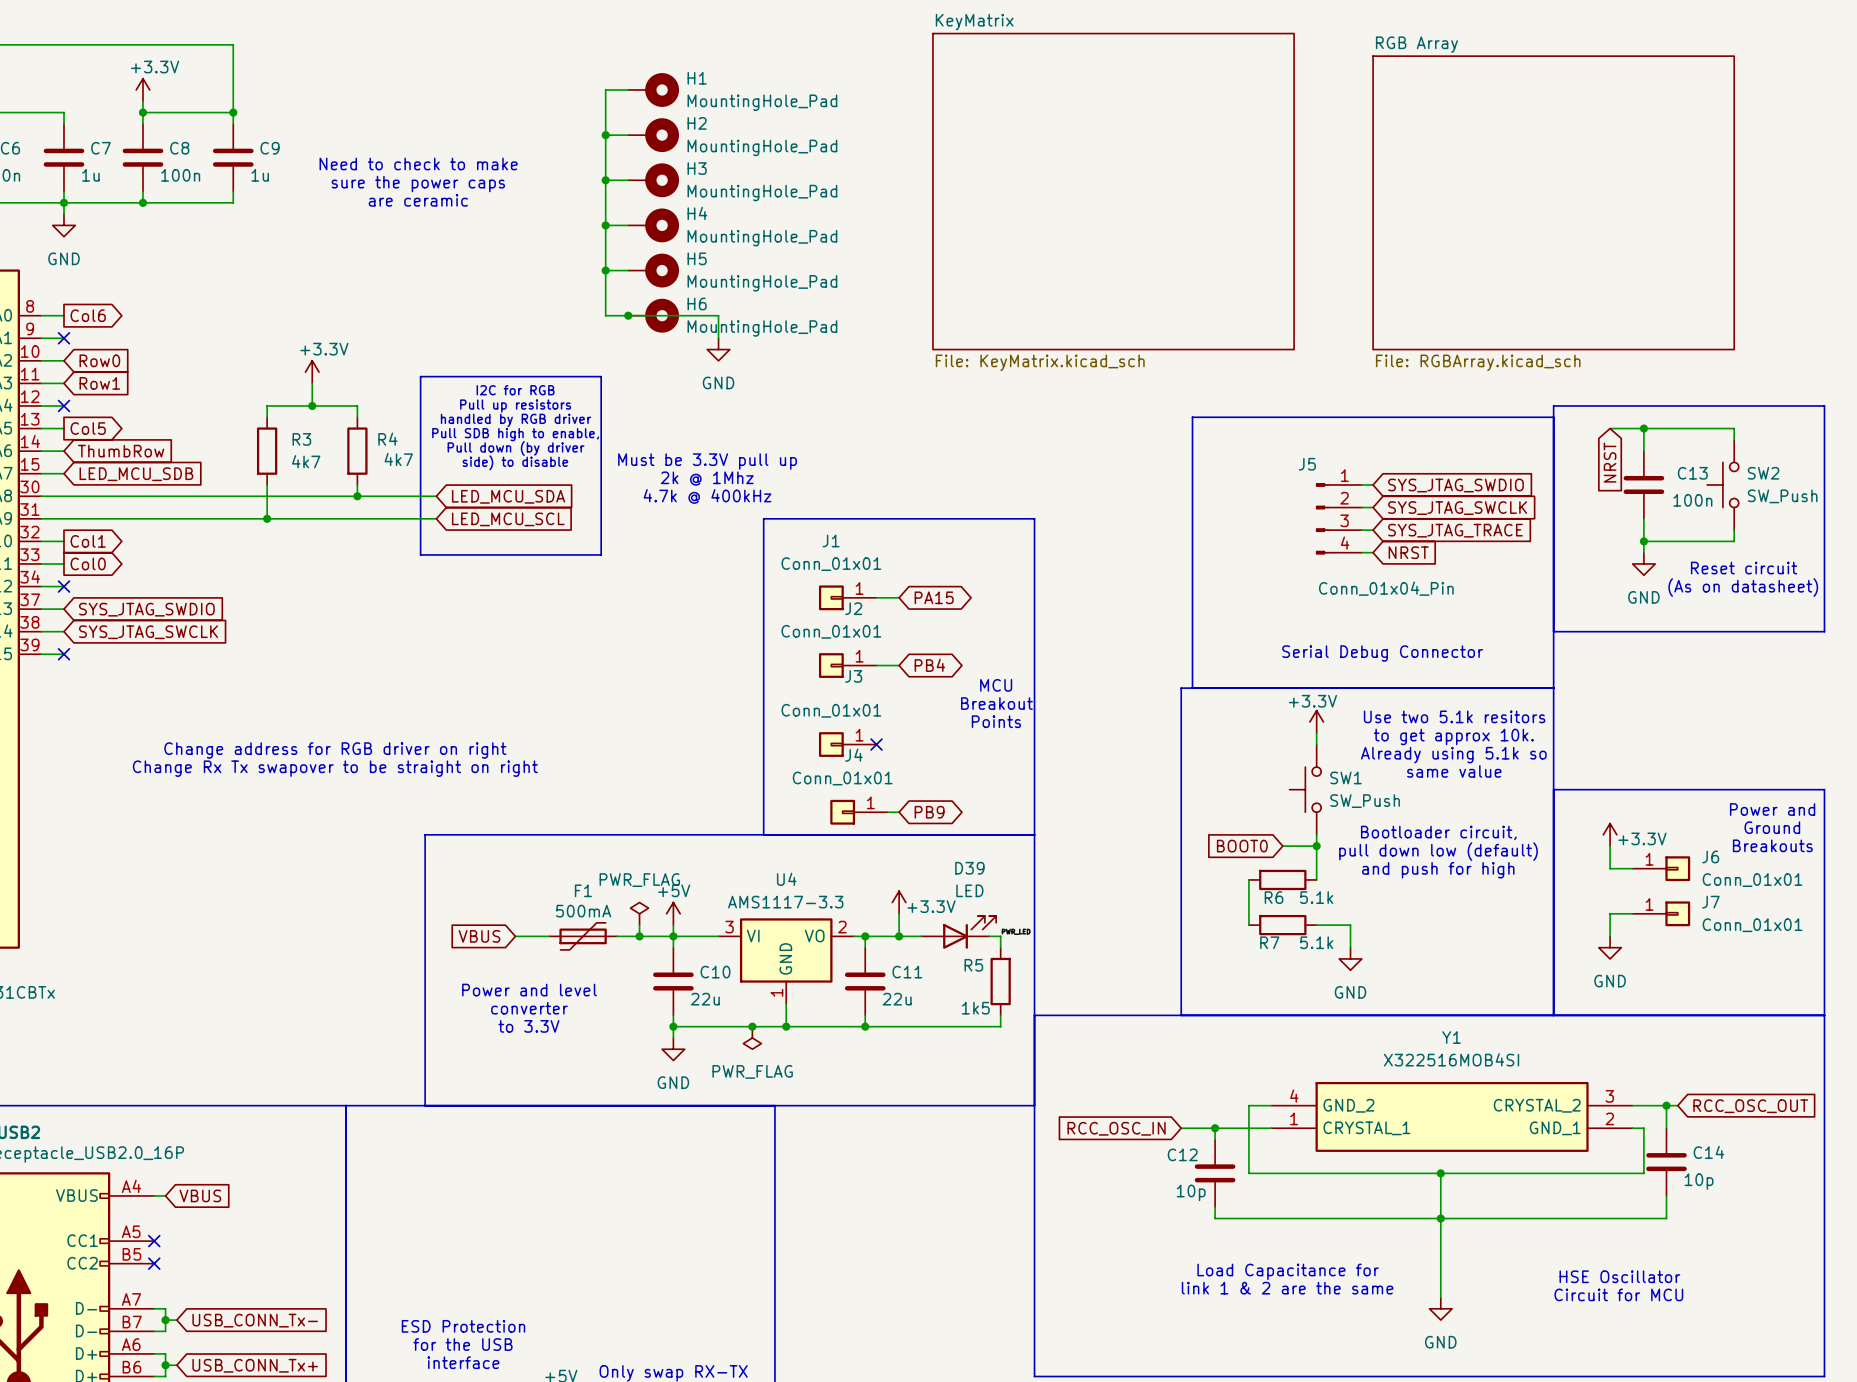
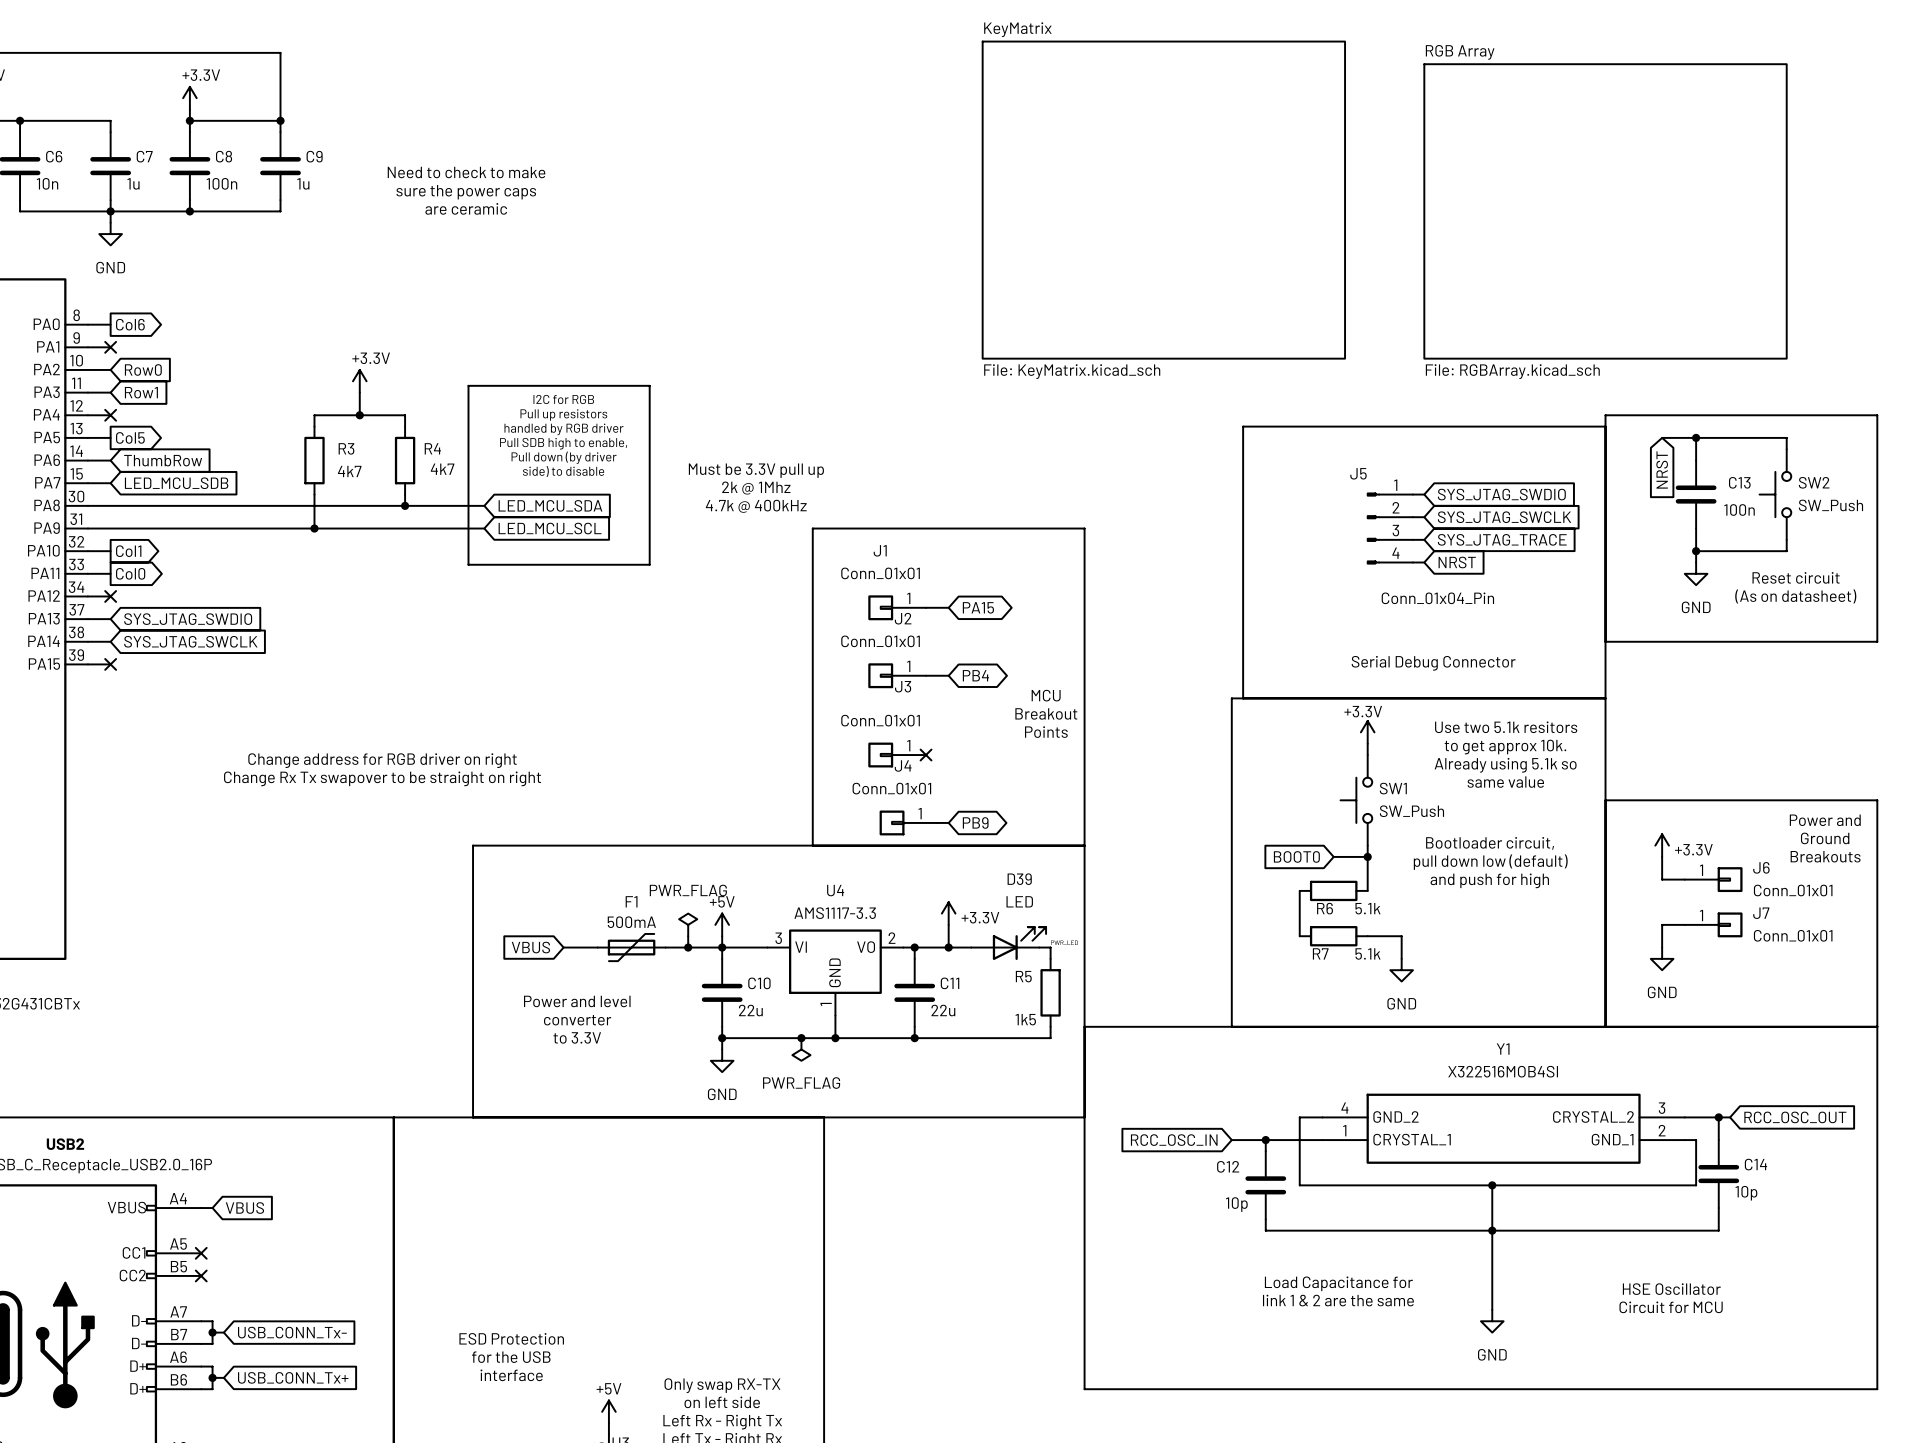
wire: (628, 89) (605, 89) (605, 315) (718, 315) (718, 338) -> none
H1: MountingHole_Pad (653, 89) -> none
wire: (605, 135) (628, 135) -> none
junction: (605, 135) -> none
H2: MountingHole_Pad (653, 135) -> none
wire: (605, 180) (628, 180) -> none
junction: (605, 180) -> none
H3: MountingHole_Pad (653, 180) -> none
wire: (605, 225) (628, 225) -> none
junction: (605, 225) -> none
H4: MountingHole_Pad (653, 225) -> none
wire: (605, 270) (628, 270) -> none
junction: (605, 270) -> none
H5: MountingHole_Pad (653, 270) -> none
junction: (628, 315) -> none
H6: MountingHole_Pad (653, 315) -> none
power symbol: GND (718, 349) -> none

